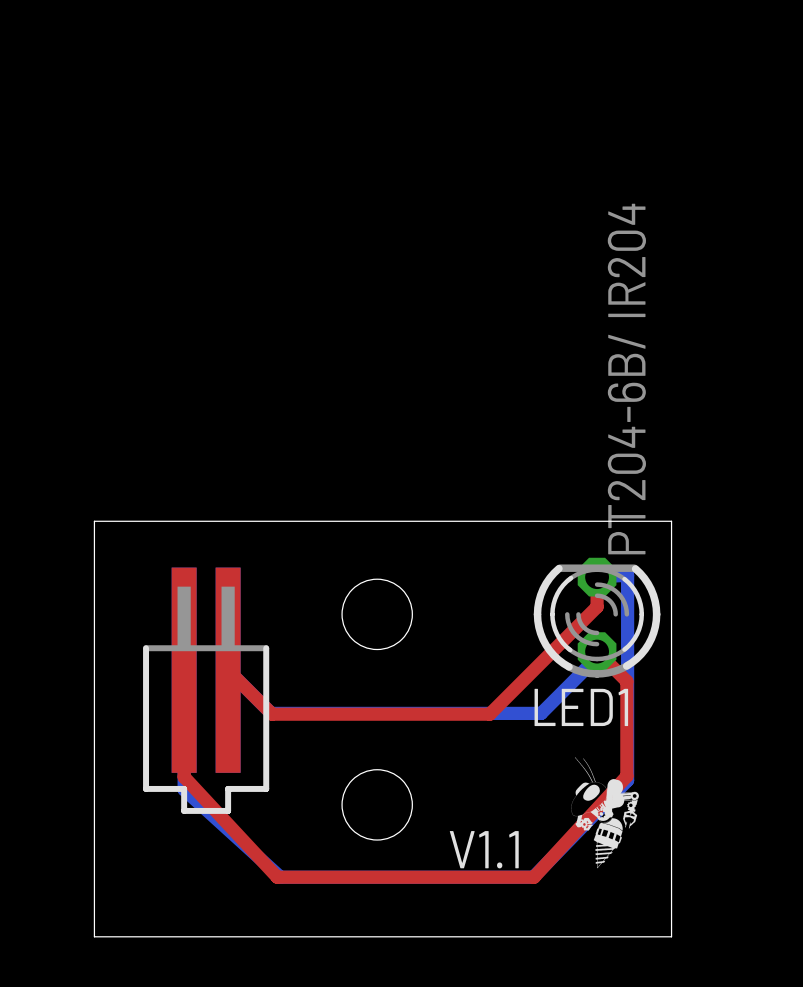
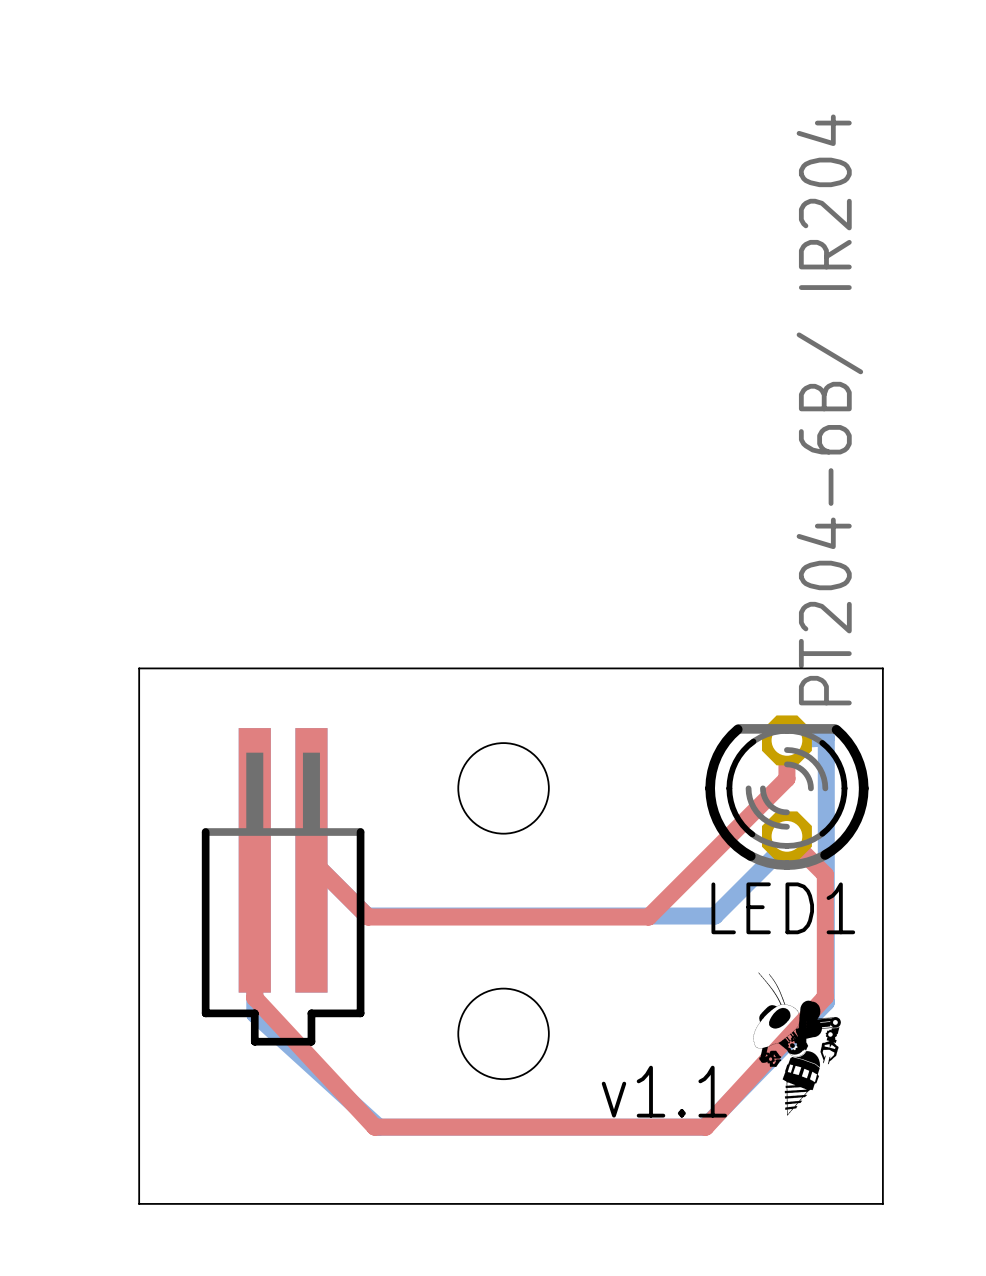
text: V1.1 (484, 849) -> v1.1 (664, 1091)

